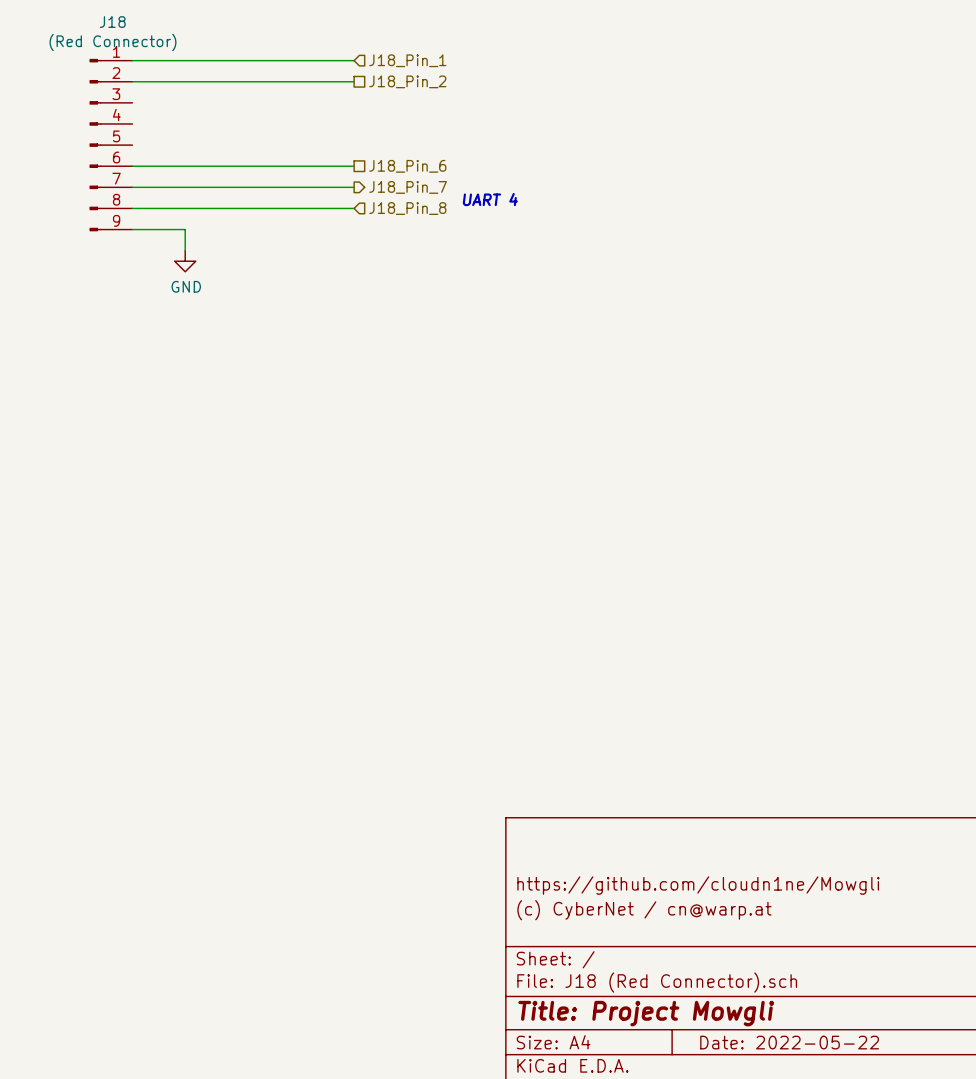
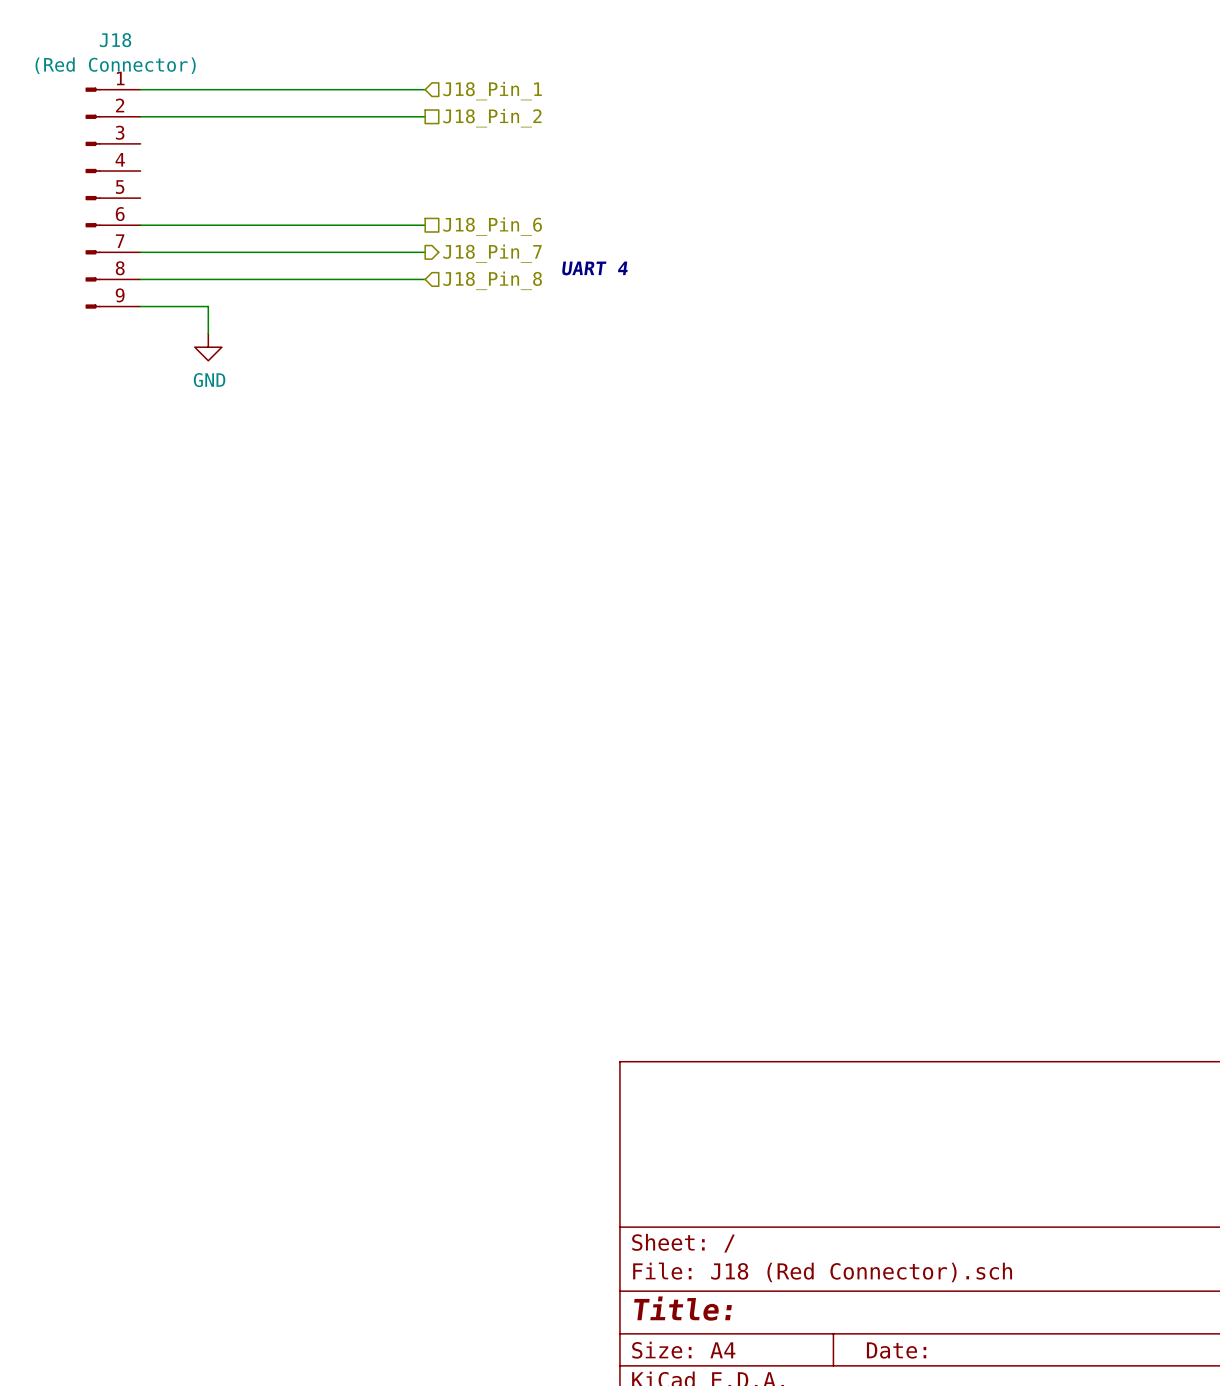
title block: https://github.com/cloudn1ne/Mowgli (698, 885) -> none
title block: (c) CyberNet / cn@warp.at (644, 910) -> none
title block: Title: Project Mowgli (646, 1013) -> Title: (683, 1308)
title block: Date: 2022-05-22 (789, 1042) -> Date: (896, 1350)

